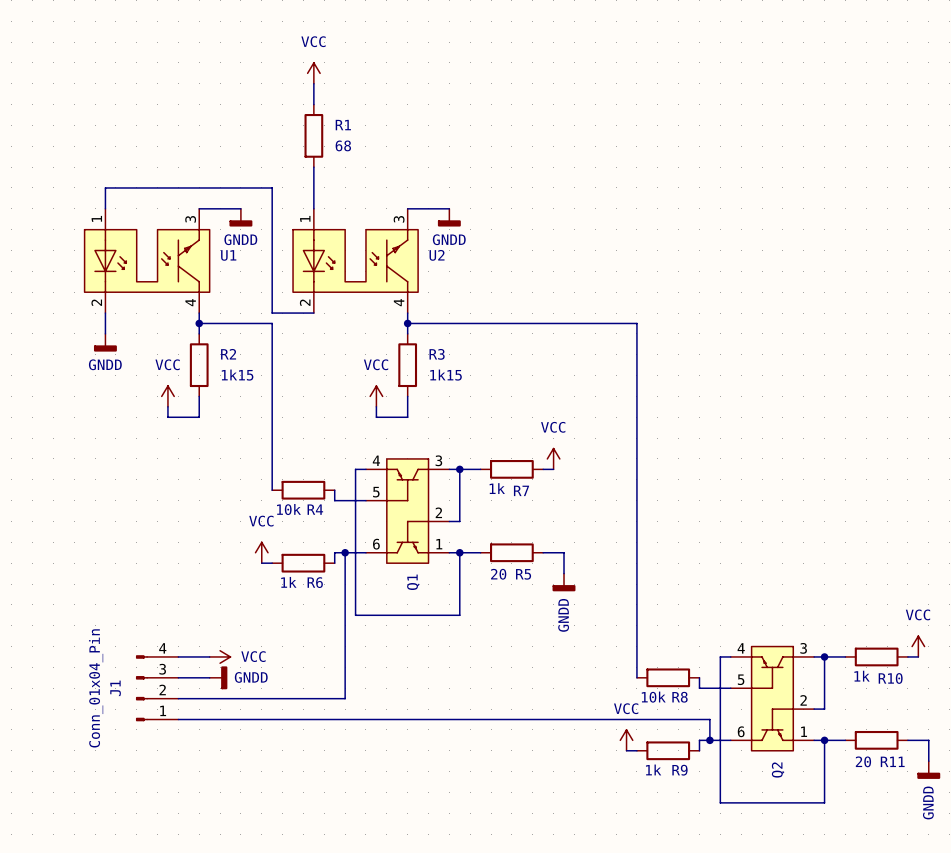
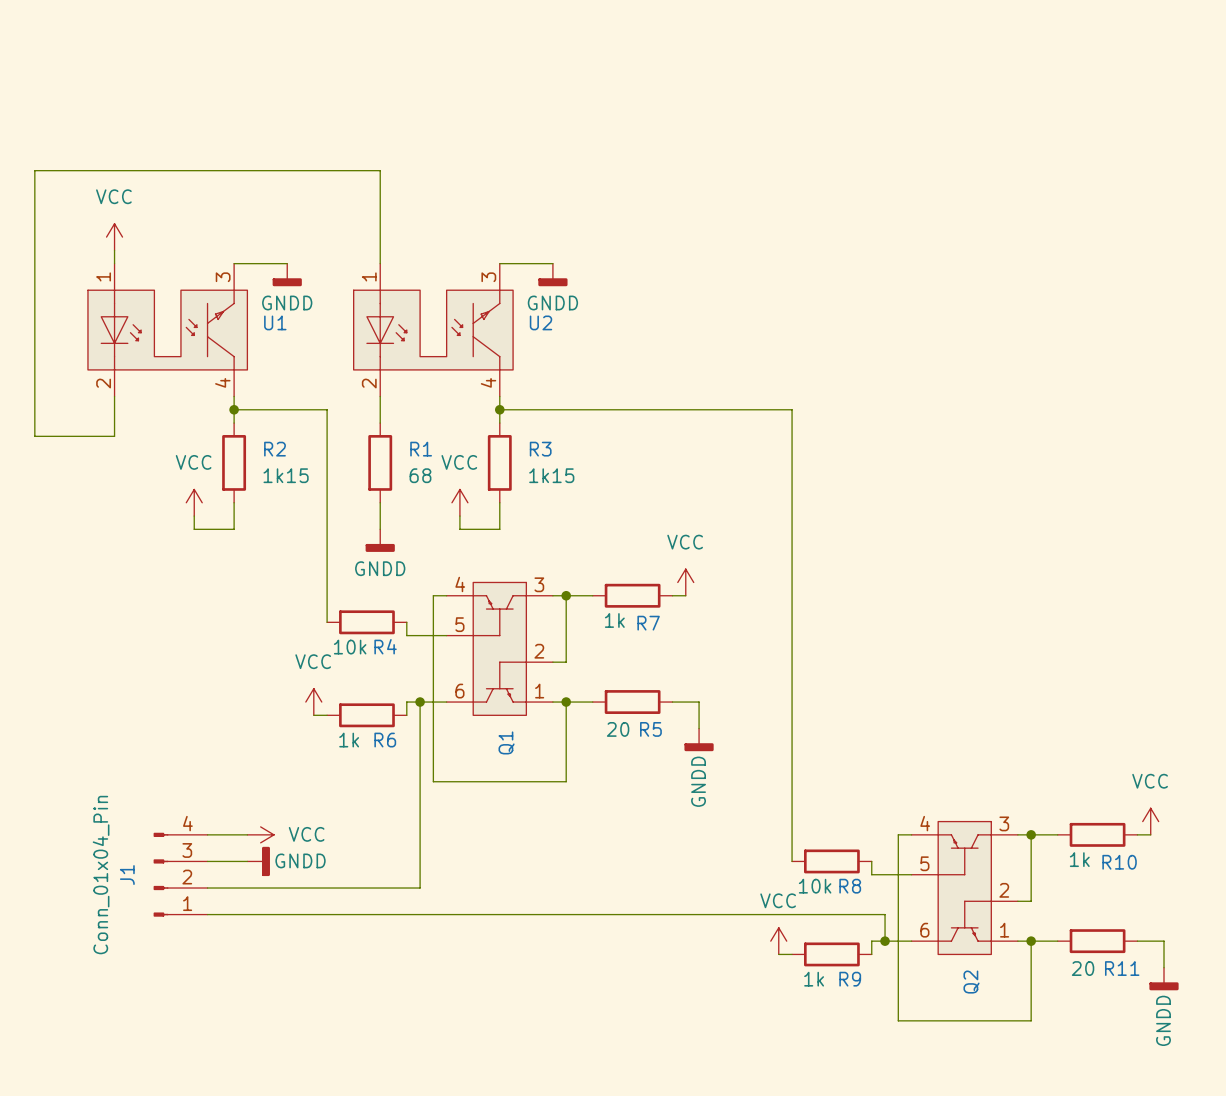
power symbol: VCC (313, 73) -> none
wire: (313, 83) (313, 104) -> none
R1 position: (313, 135) -> (380, 462)
wire: none -> (380, 210) (380, 170) (34, 170) (34, 436) (114, 436) (114, 423)
power symbol: none -> VCC (114, 237)
wire: (105, 198) (105, 187) (272, 187) (272, 313) (313, 313) -> (380, 423) (380, 396)
power symbol: GNDD (105, 342) -> none
wire: none -> (380, 502) (380, 529)
power symbol: none -> GNDD (380, 540)

